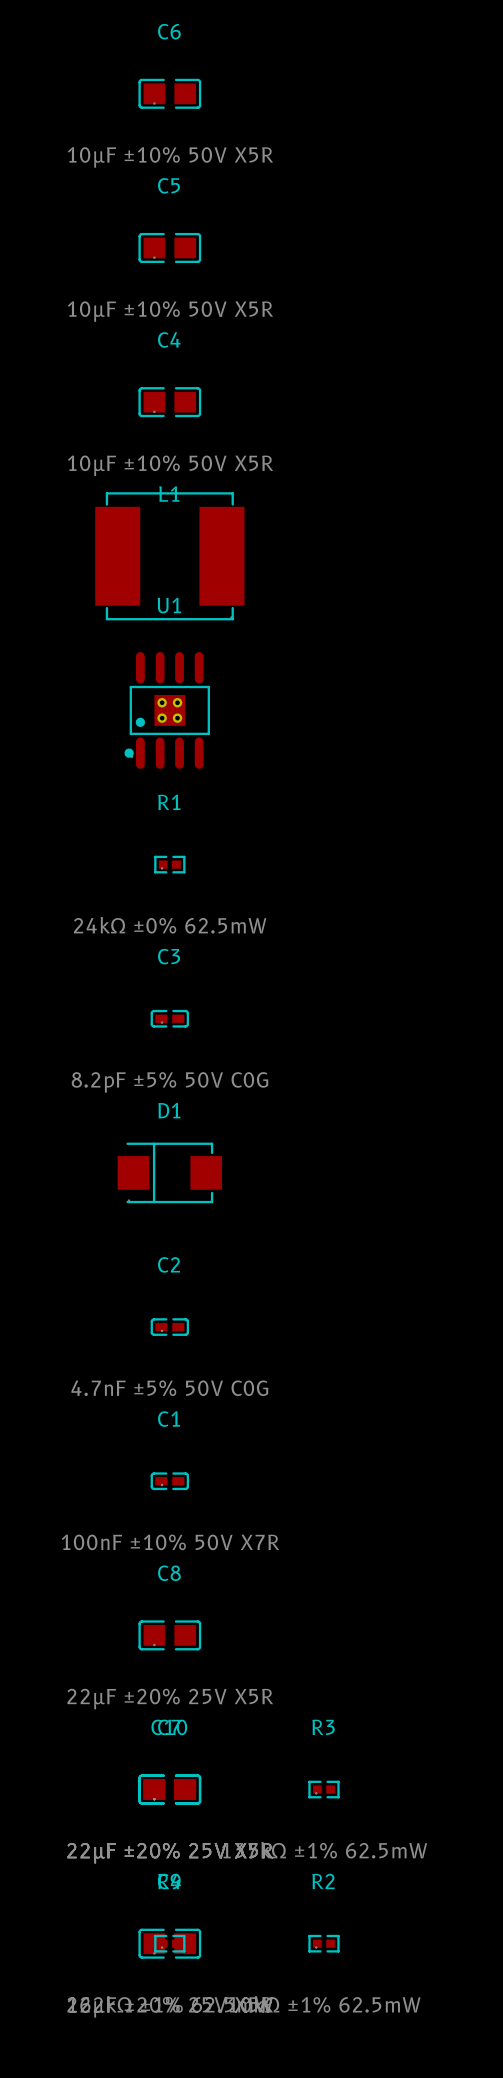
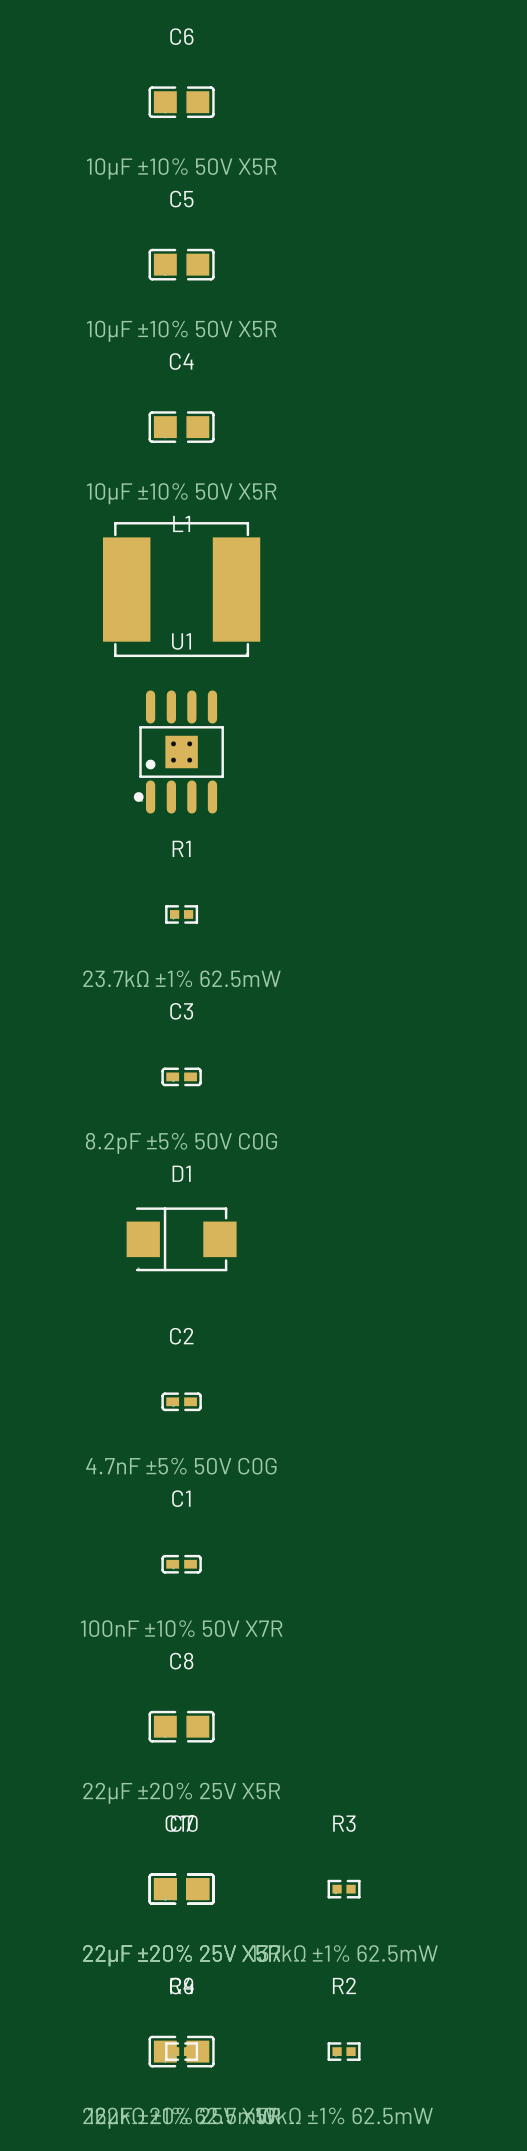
R1 value: 24kΩ ±0% 62.5mW (170, 925) -> 23.7kΩ ±1% 62.5mW (181, 978)

